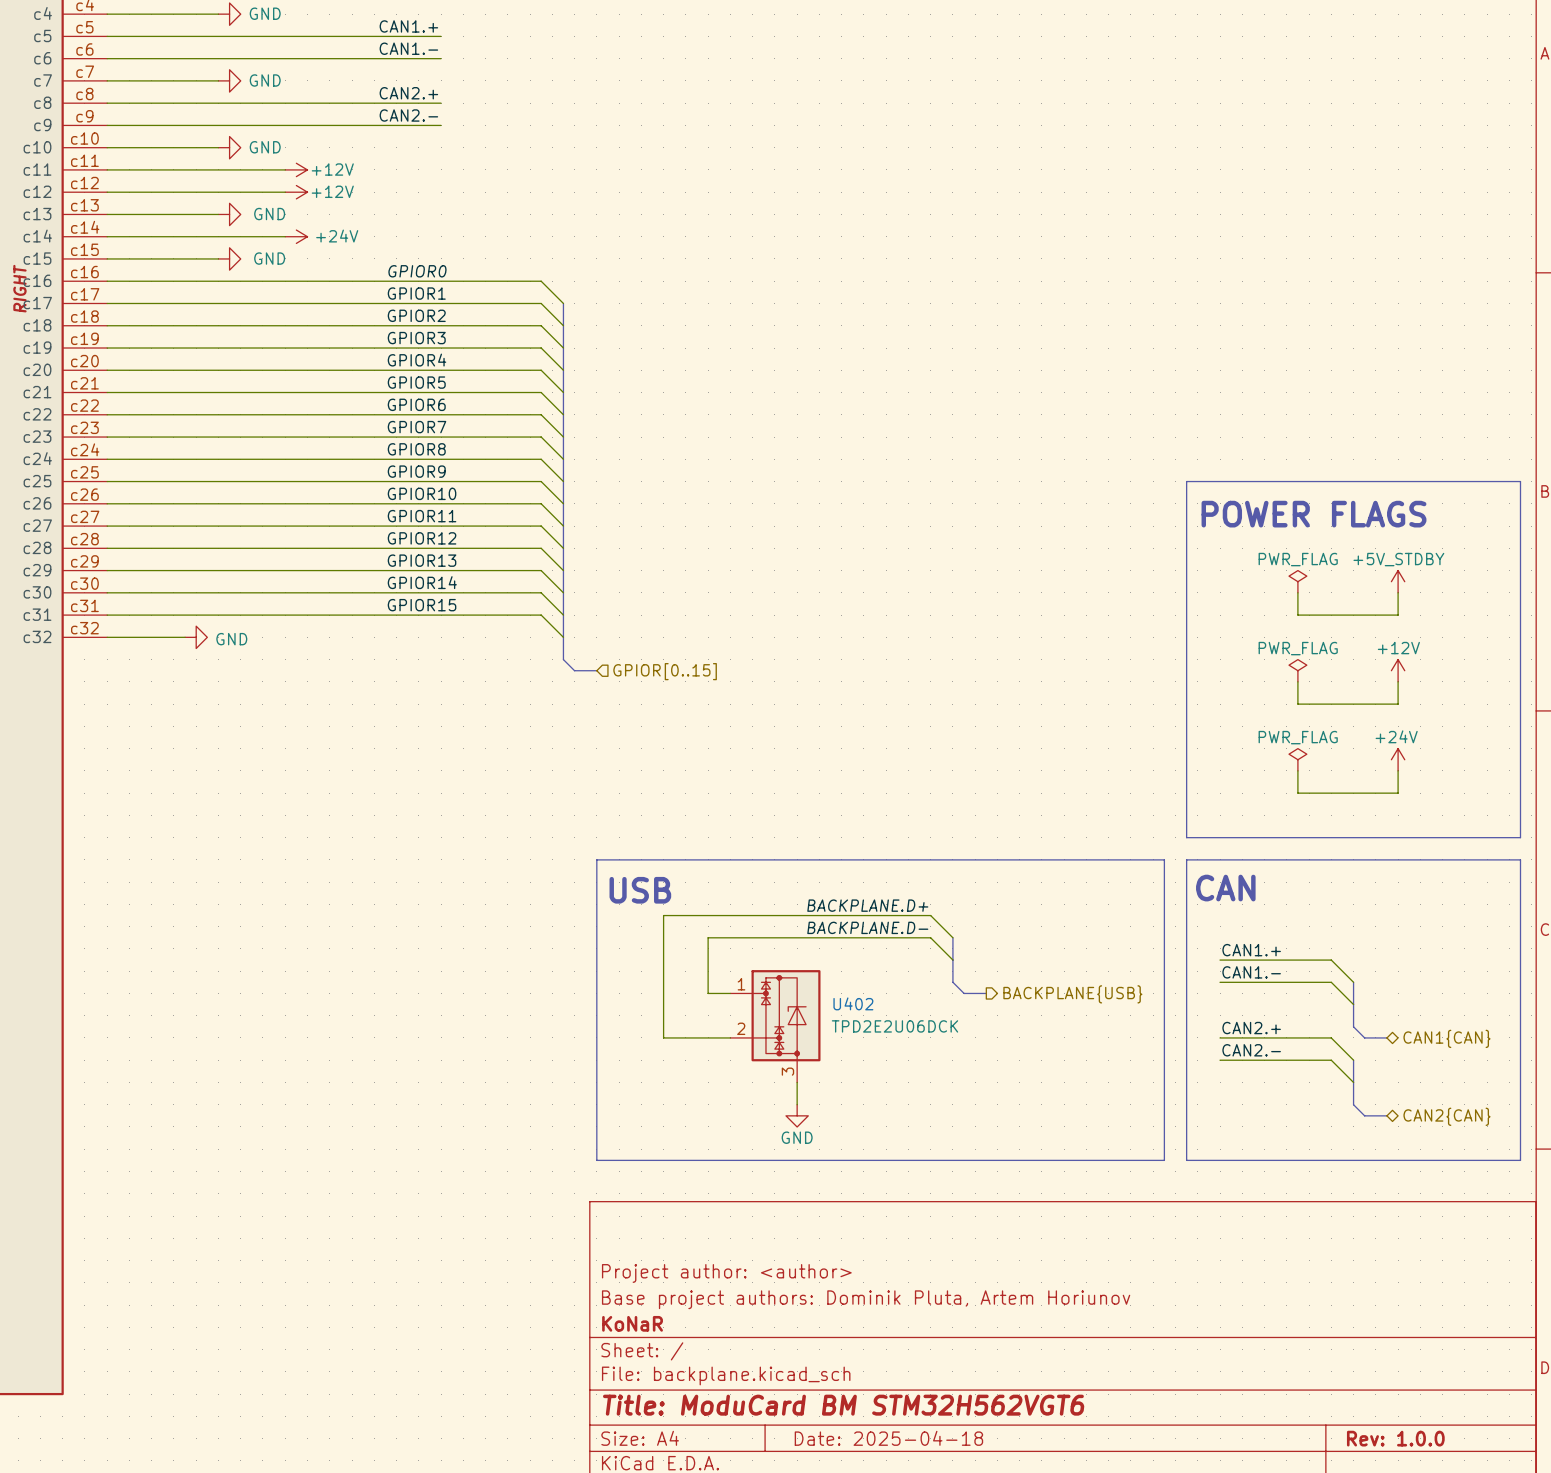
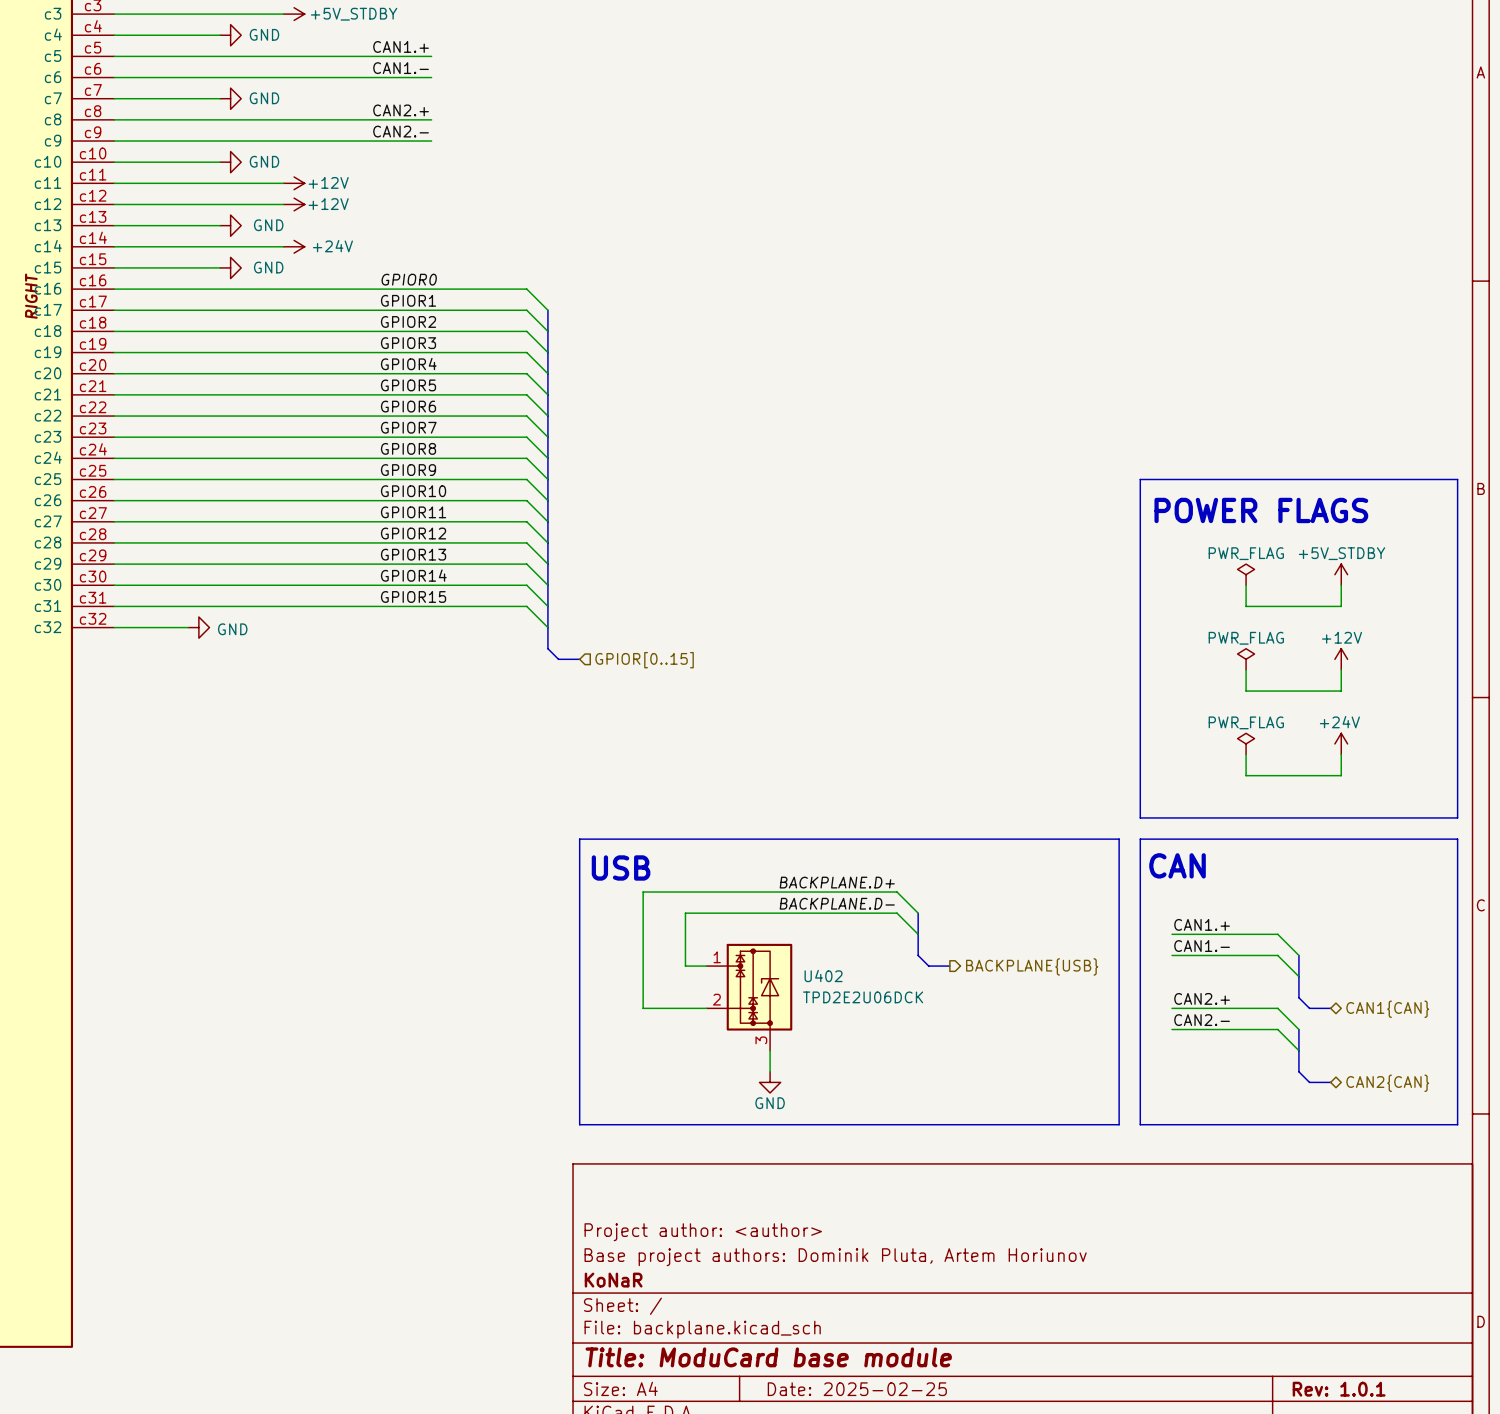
title block: Title: ModuCard BM STM32H562VGT6 (843, 1405) -> Title: ModuCard base module (768, 1357)
title block: Date: 2025-04-18 (888, 1438) -> Date: 2025-02-25 (857, 1389)
title block: Rev: 1.0.0 (1395, 1438) -> Rev: 1.0.1 (1339, 1389)

